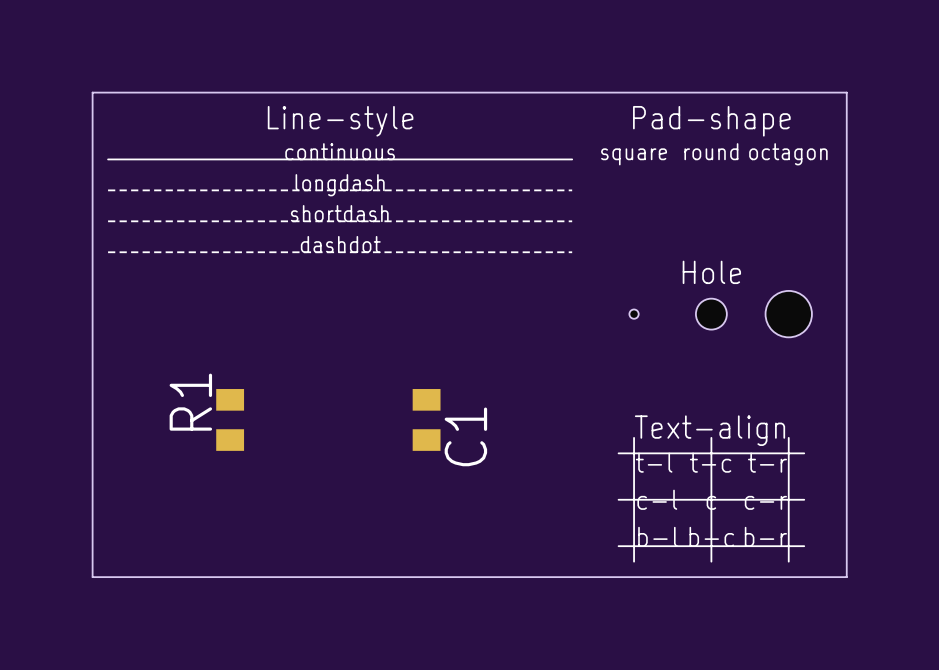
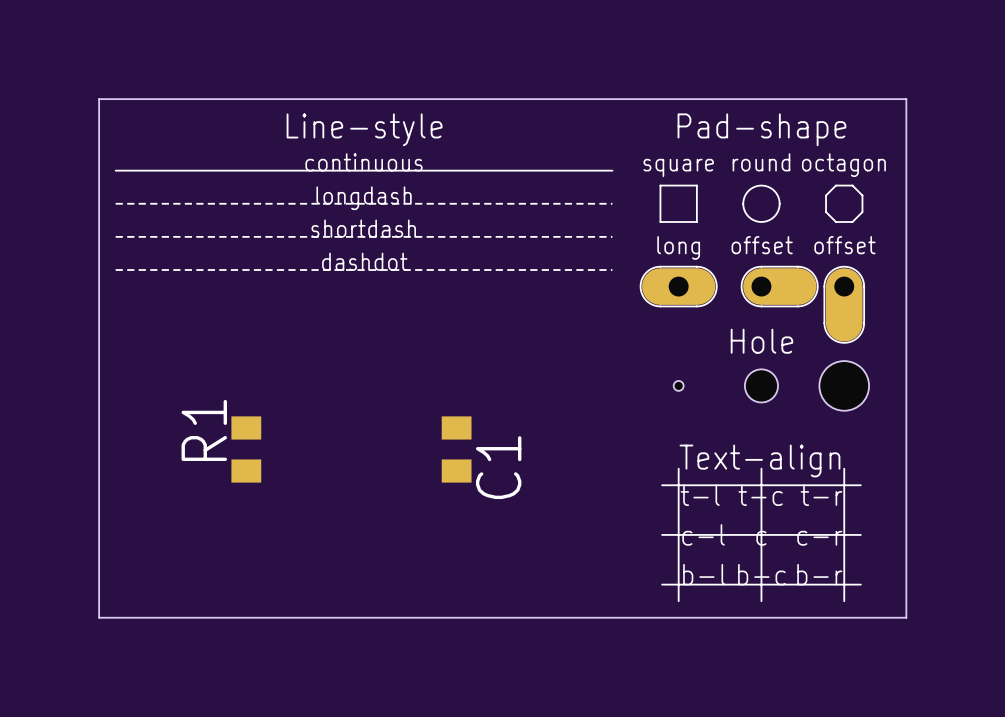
line: none -> (660, 185) (696, 185) (696, 221) (660, 221) (660, 185)
line: none -> (835, 185) (852, 185) (862, 195) (862, 212) (852, 221) (835, 221) (826, 212) (826, 195) (835, 185)
line: none -> (743, 203) (748, 190) (761, 185) (774, 190) (779, 203) (774, 216) (761, 221) (748, 216) (743, 203)
text: none -> offset (762, 245)
text: none -> offset (844, 245)
text: none -> long (678, 247)
line: none -> (660, 266) (696, 266) (706, 269) (712, 274) (716, 281) (716, 289) (714, 296) (708, 302) (699, 306) (660, 306) (650, 303) (642, 294) (641, 281) (648, 270) (660, 266)
line: none -> (761, 266) (797, 266) (807, 269) (813, 274) (817, 281) (817, 289) (815, 296) (809, 302) (800, 306) (761, 306) (751, 303) (743, 294) (742, 281) (749, 270) (761, 266)
part: none -> (678, 286)
part: none -> (779, 286)
line: none -> (824, 286) (824, 322) (827, 332) (832, 338) (839, 342) (846, 342) (854, 340) (860, 335) (863, 325) (864, 286) (861, 276) (851, 268) (839, 267) (828, 274) (824, 286)
text position: Hole (711, 272) -> Hole (761, 341)
part: none -> (844, 304)
hole position: (634, 314) -> (678, 385)
hole position: (711, 314) -> (761, 385)
hole position: (788, 314) -> (844, 385)

